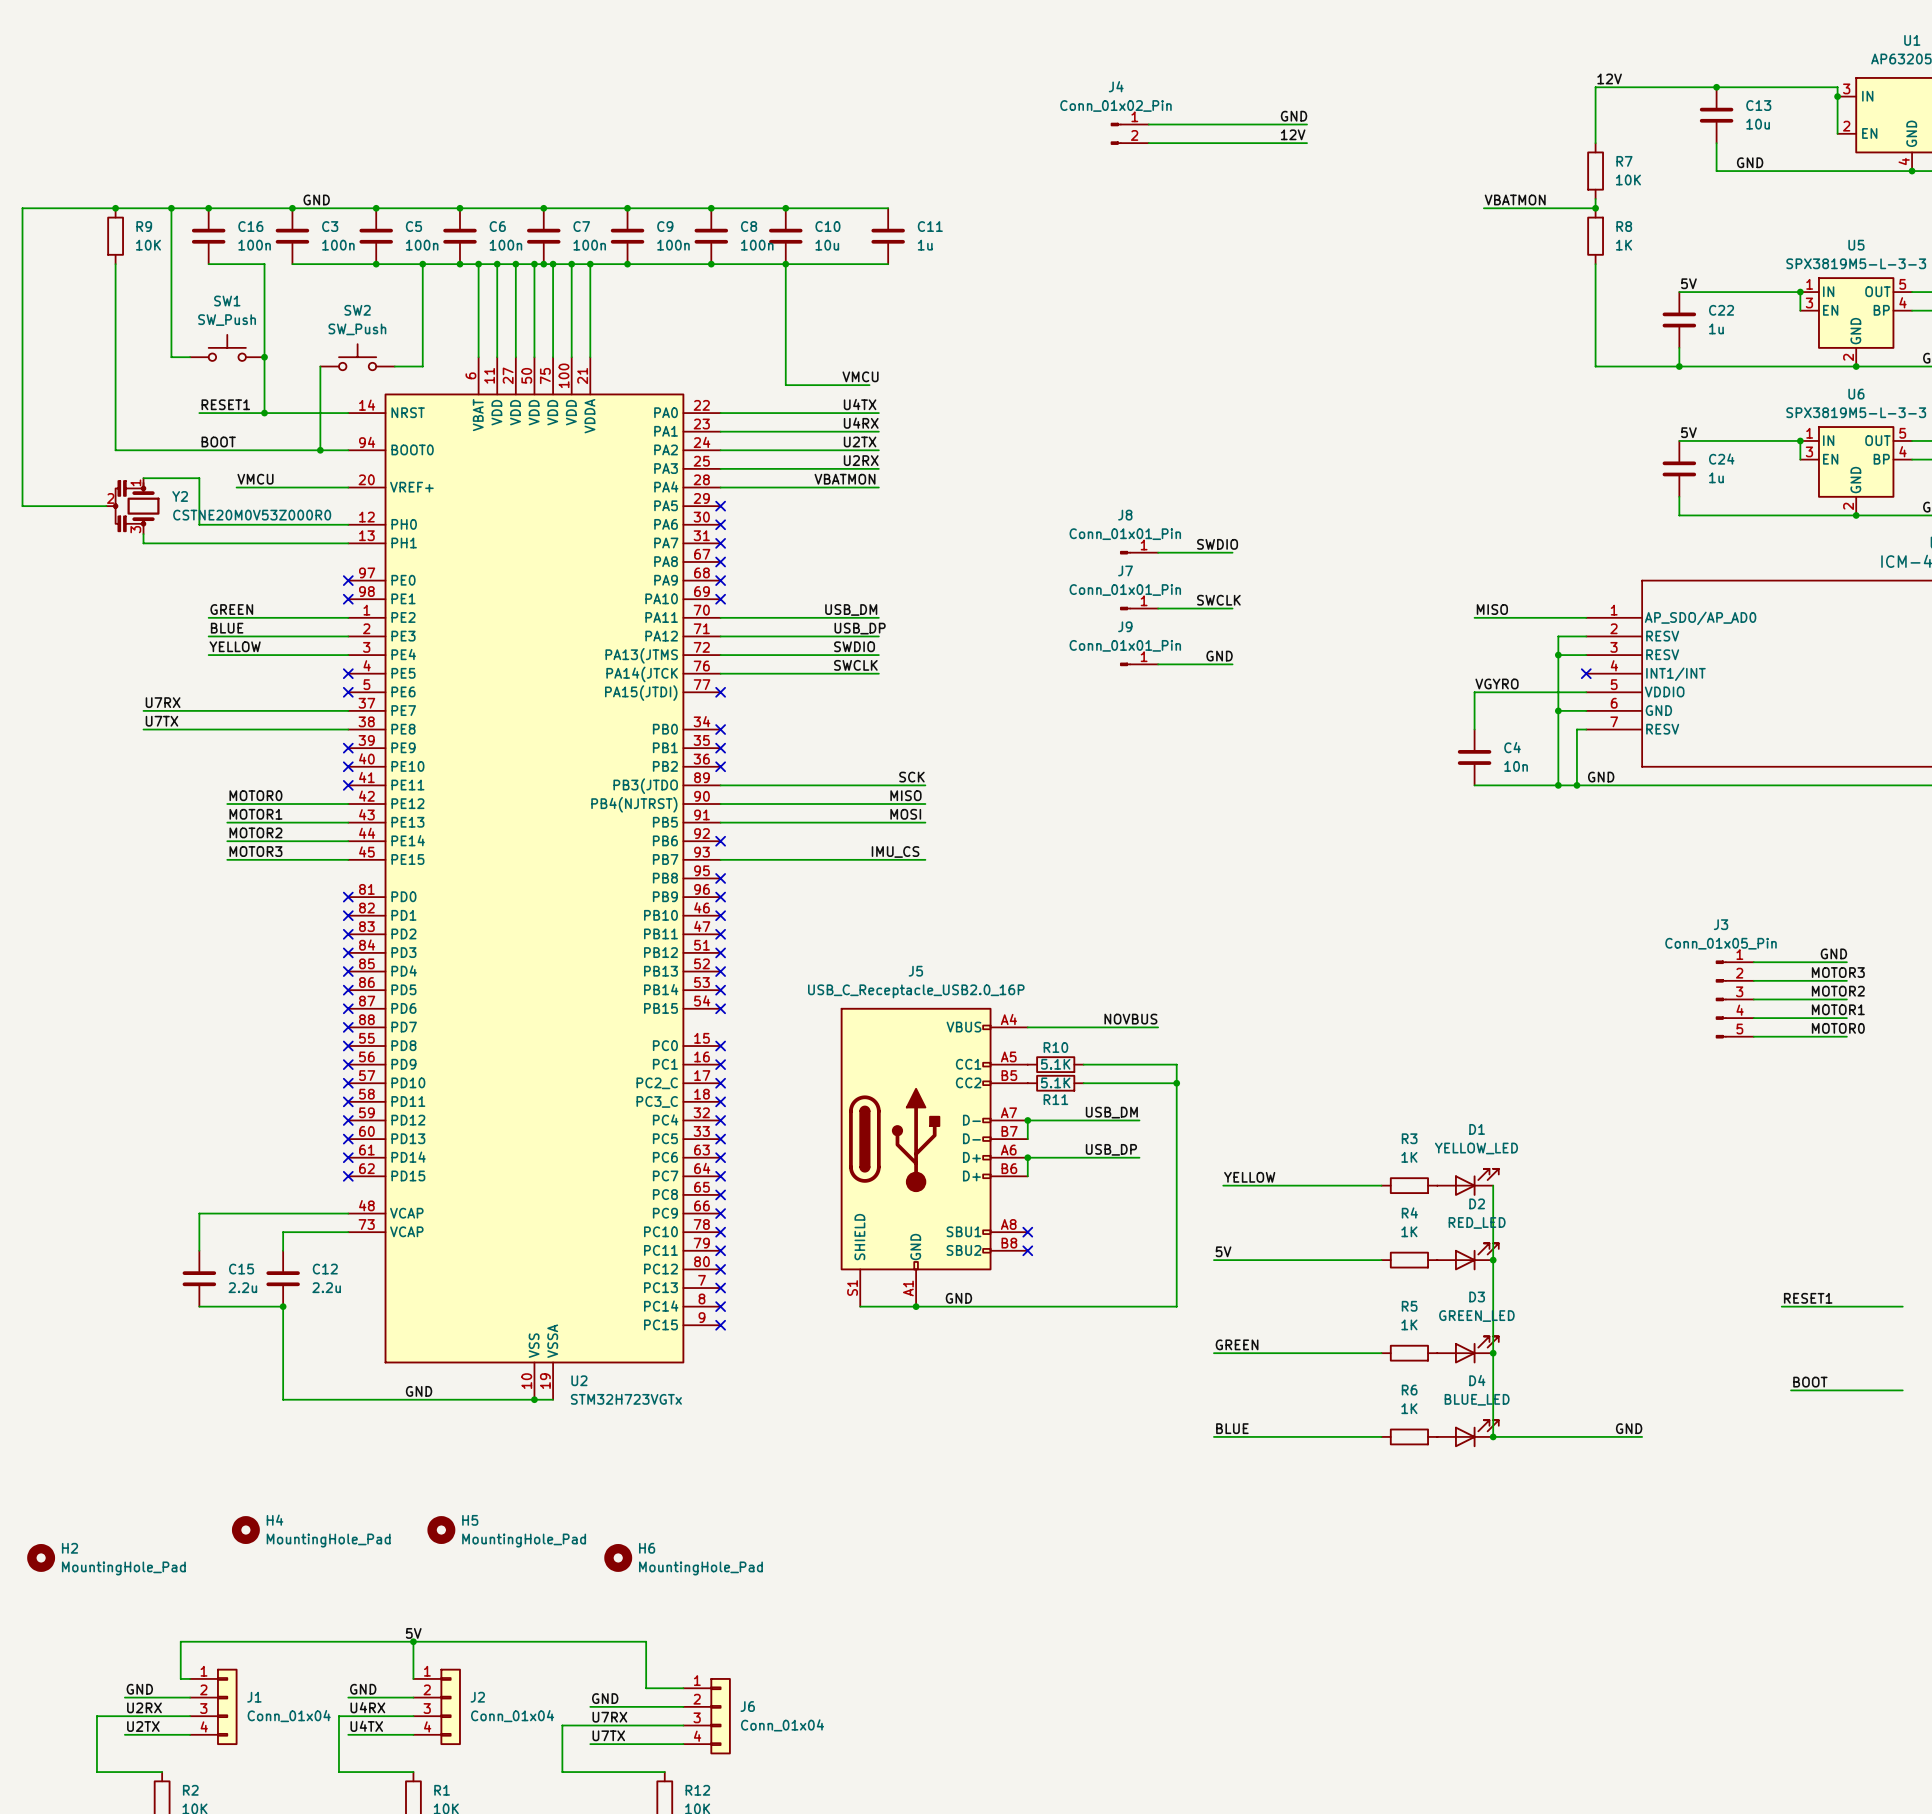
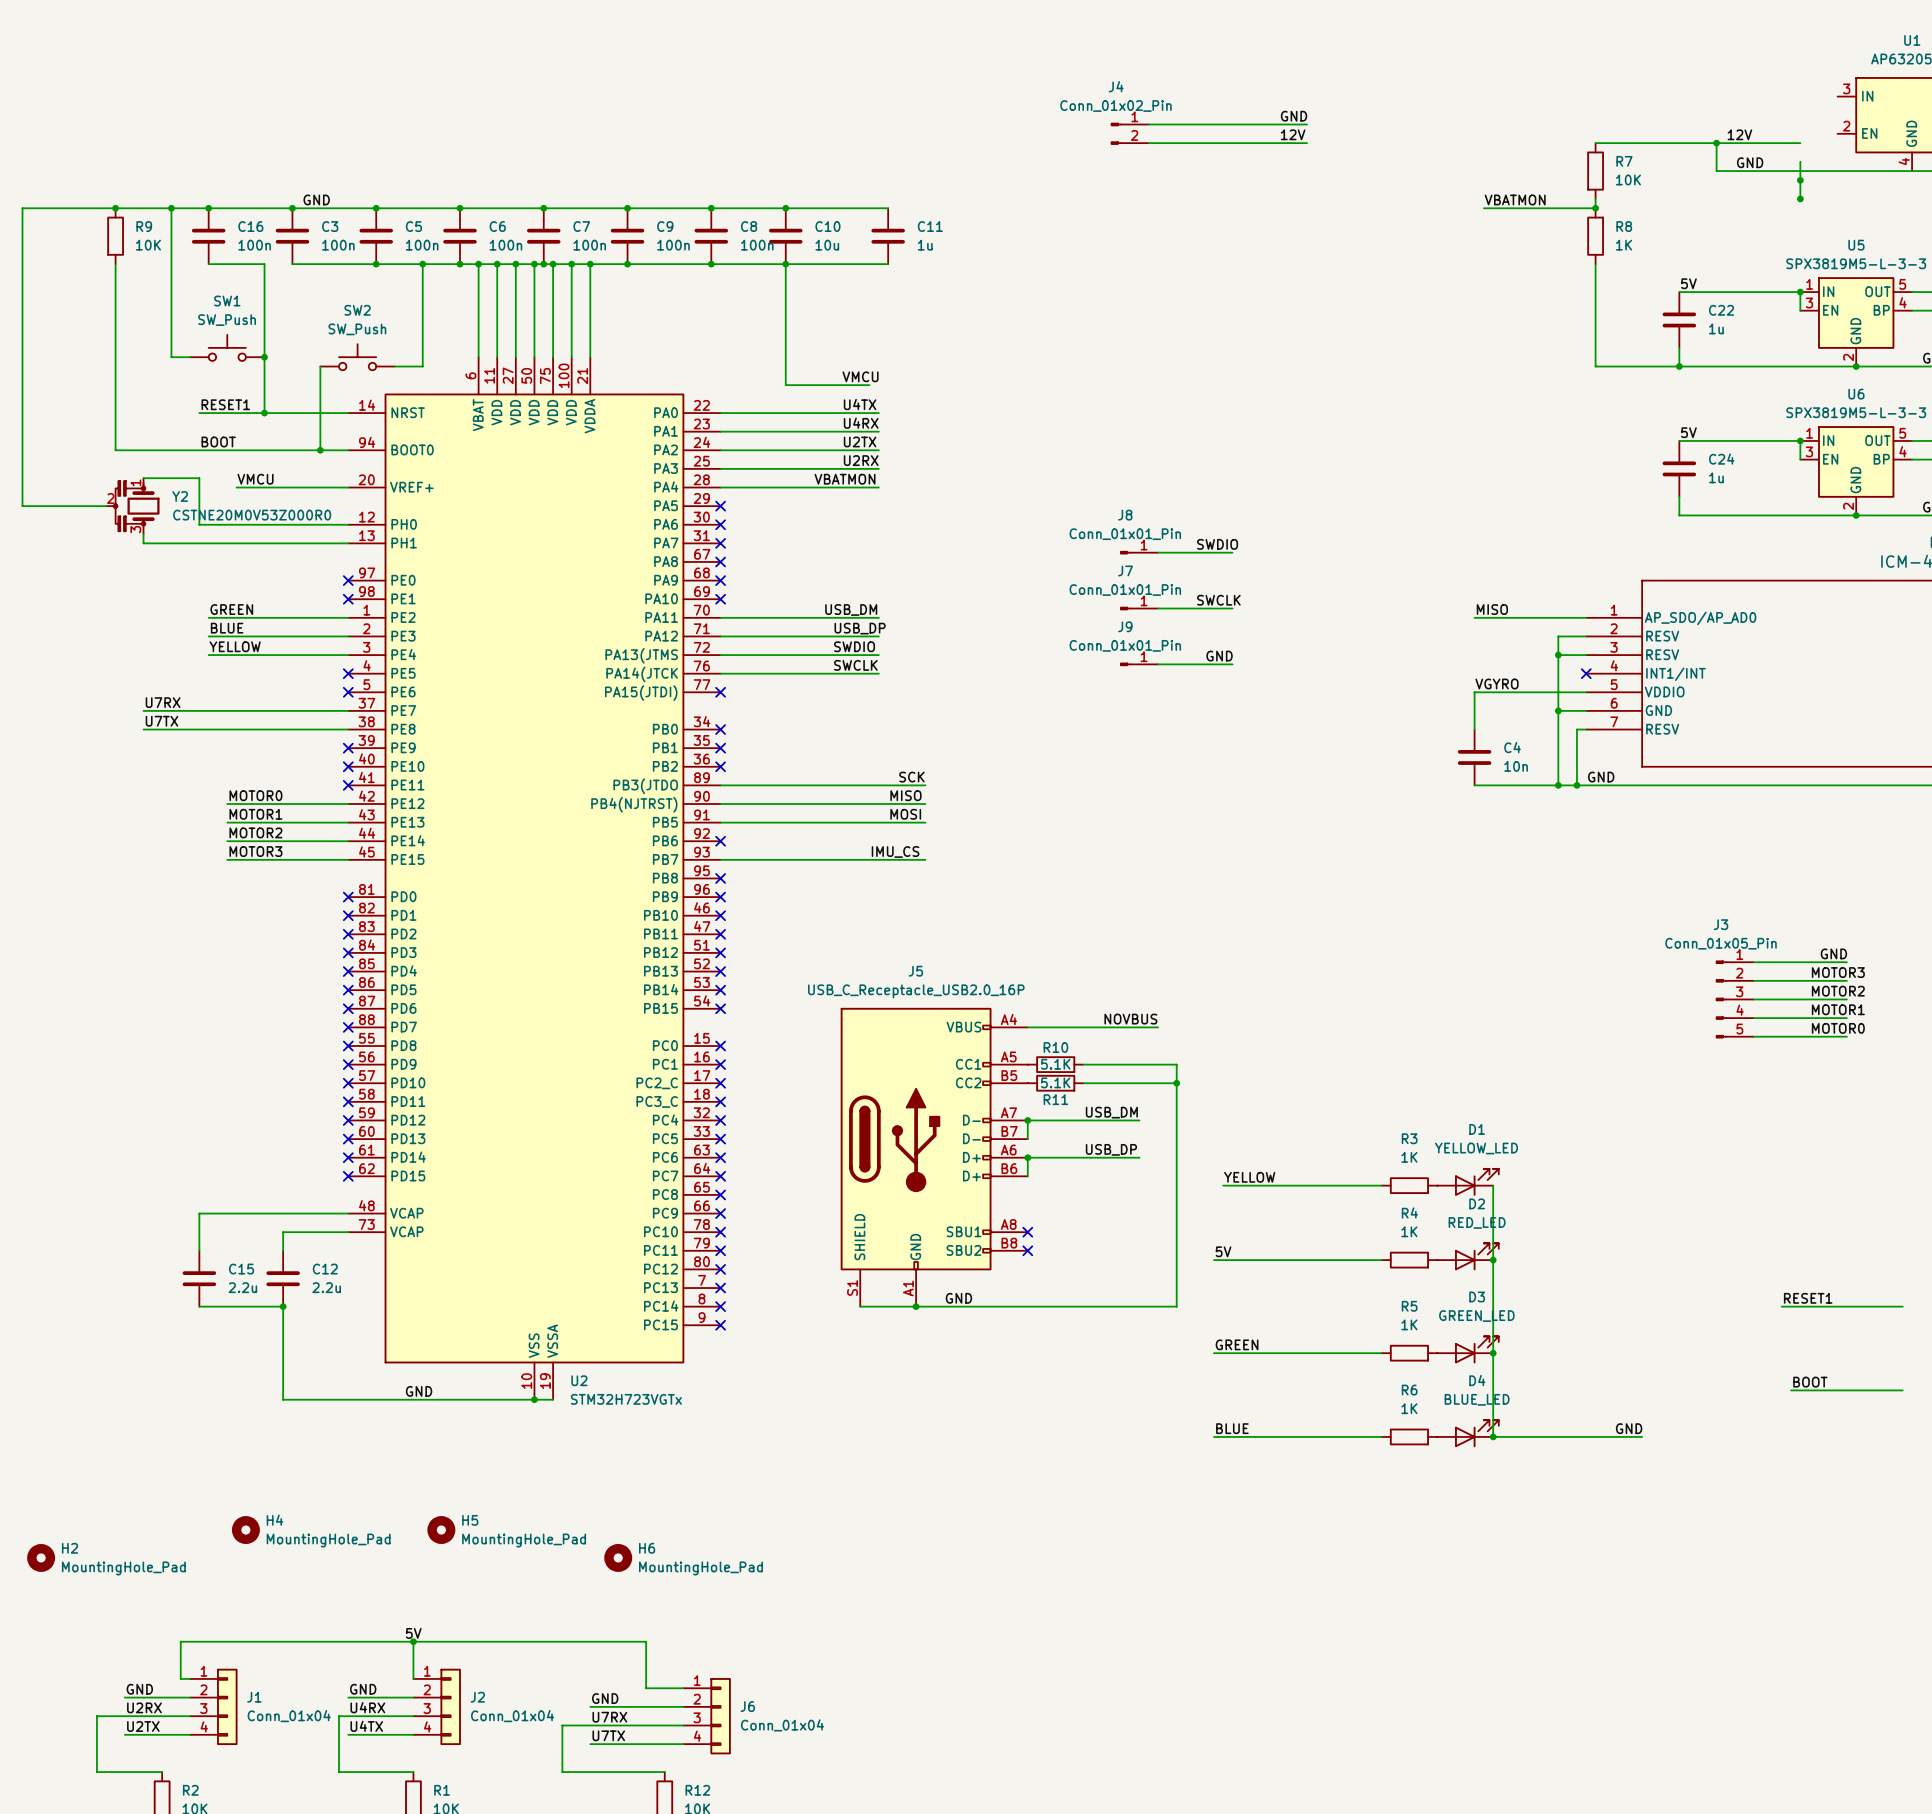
label position: 12V (1609, 78) -> 12V (1739, 134)
junction: (1716, 87) -> none
junction: (1837, 96) -> none
C13: 10u (1716, 115) -> none
wire: (1837, 133) (1837, 87) (1595, 87) (1595, 143) -> (1800, 143) (1595, 143)
junction: none -> (1716, 143)
wire: none -> (1800, 161) (1800, 198)
junction: (1912, 171) -> none
junction: none -> (1800, 180)
junction: none -> (1800, 198)

